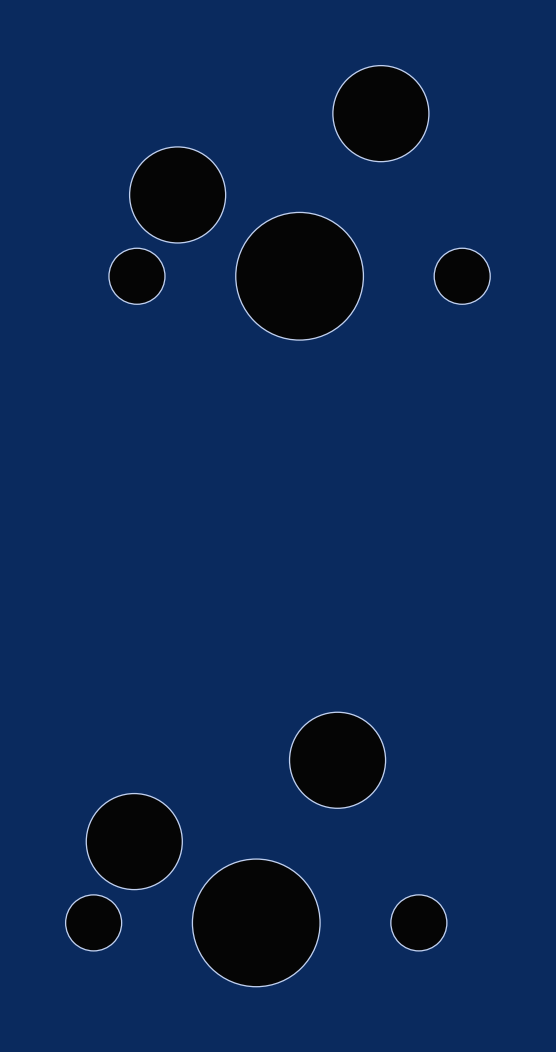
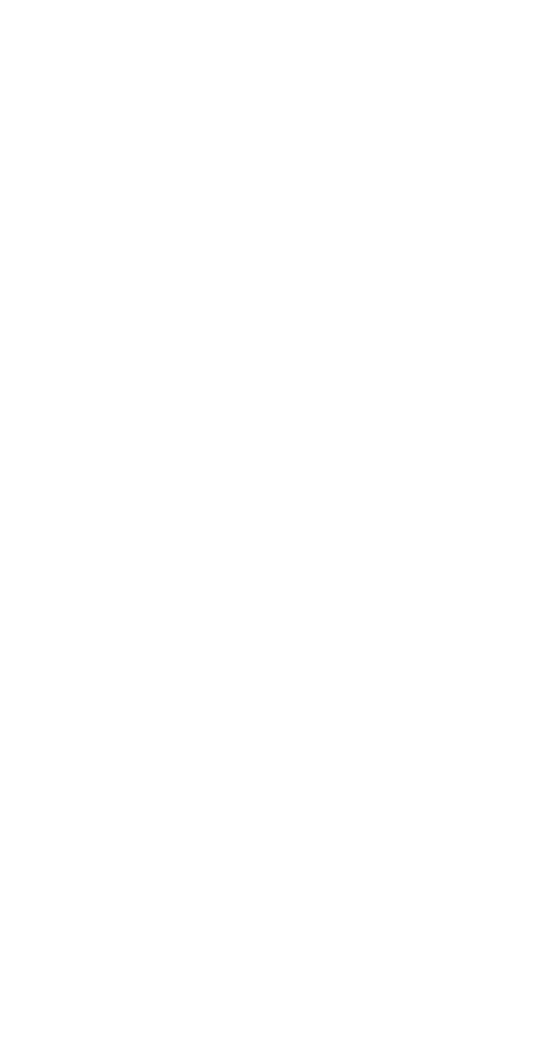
part: (299, 202) -> none
part: (256, 849) -> none

